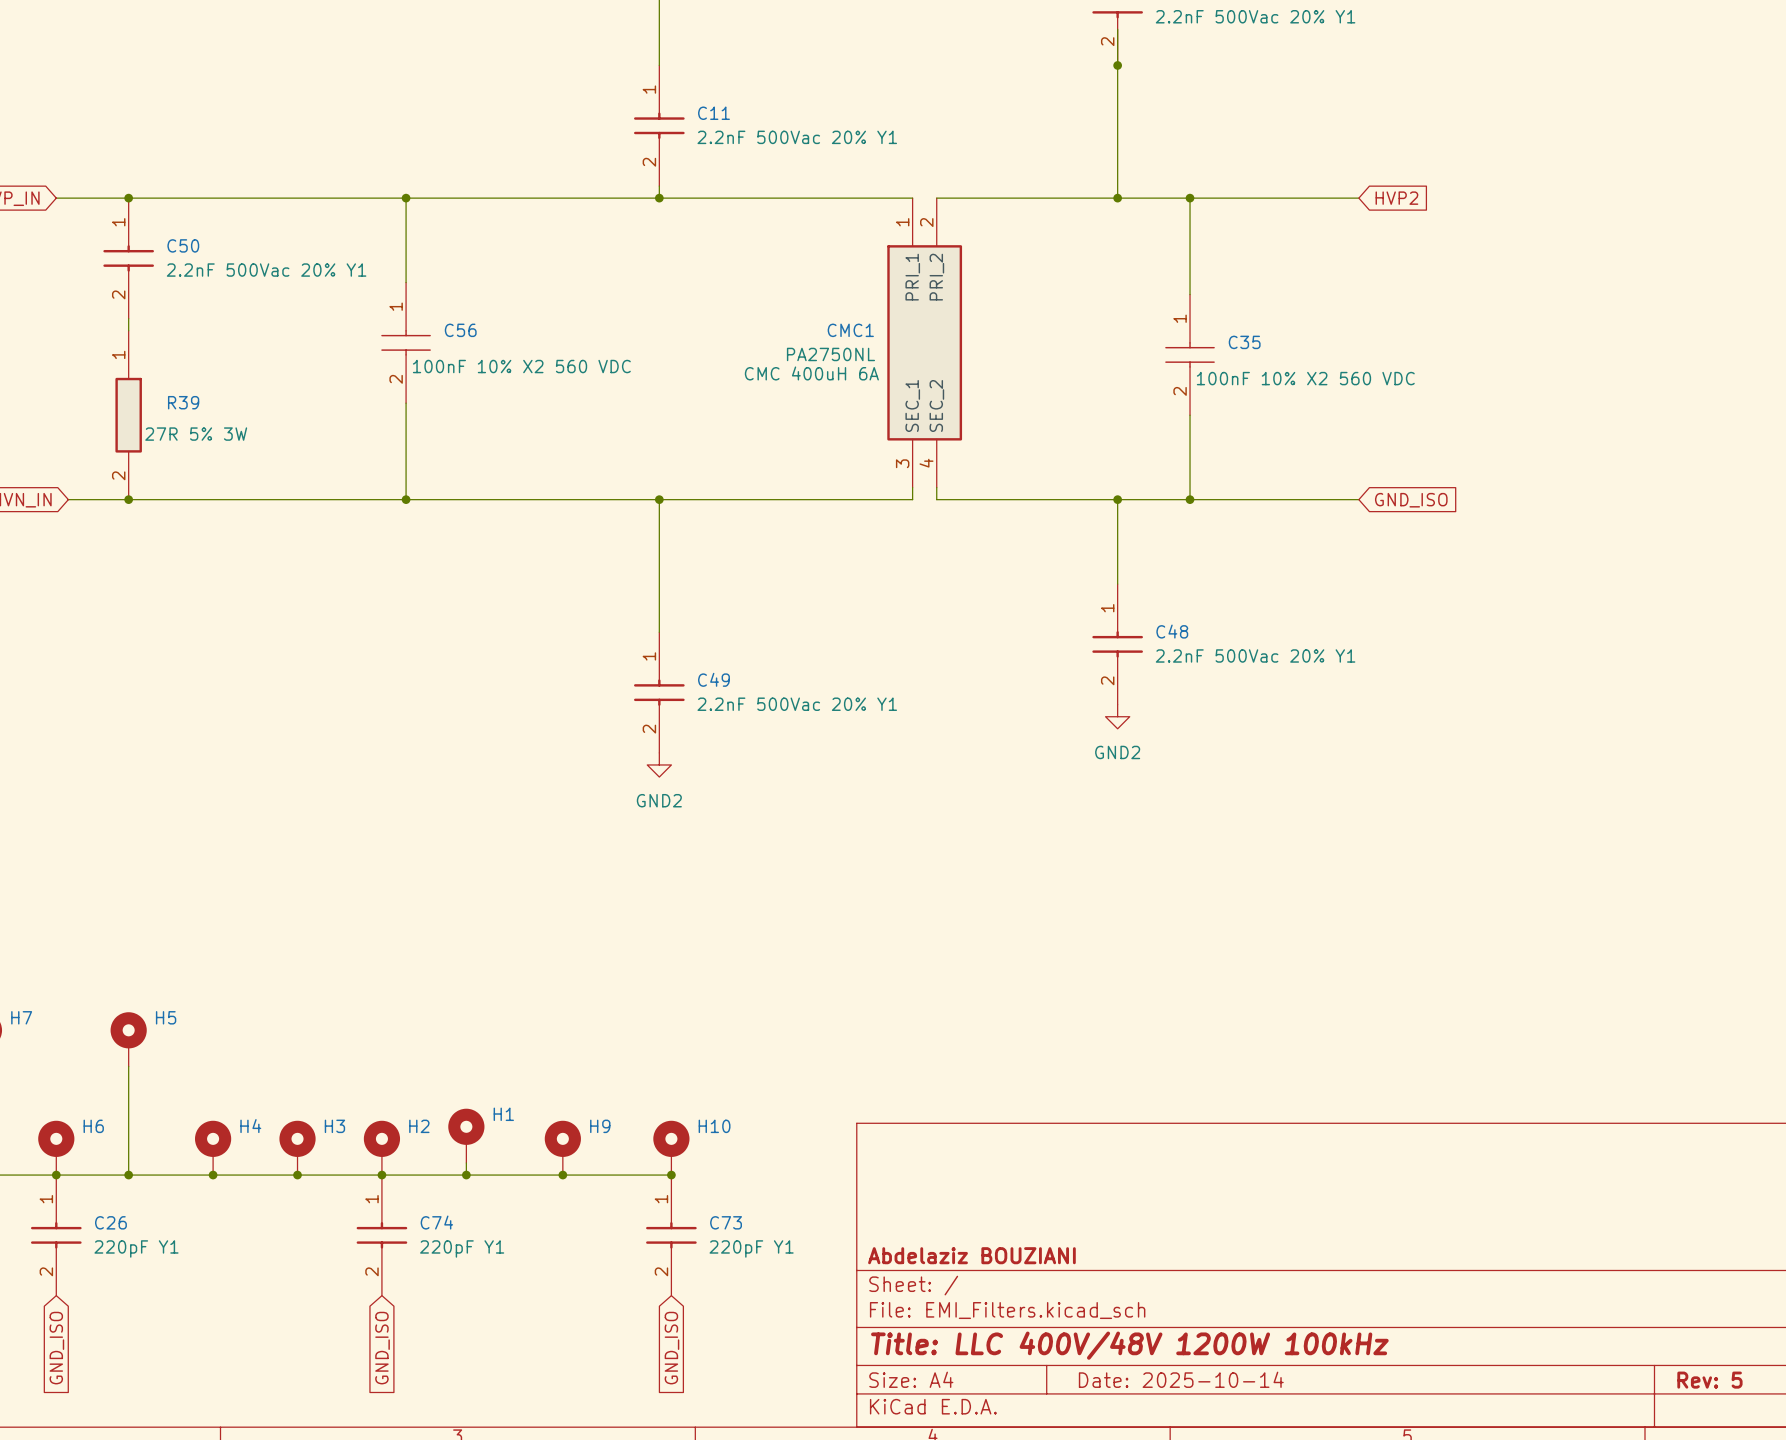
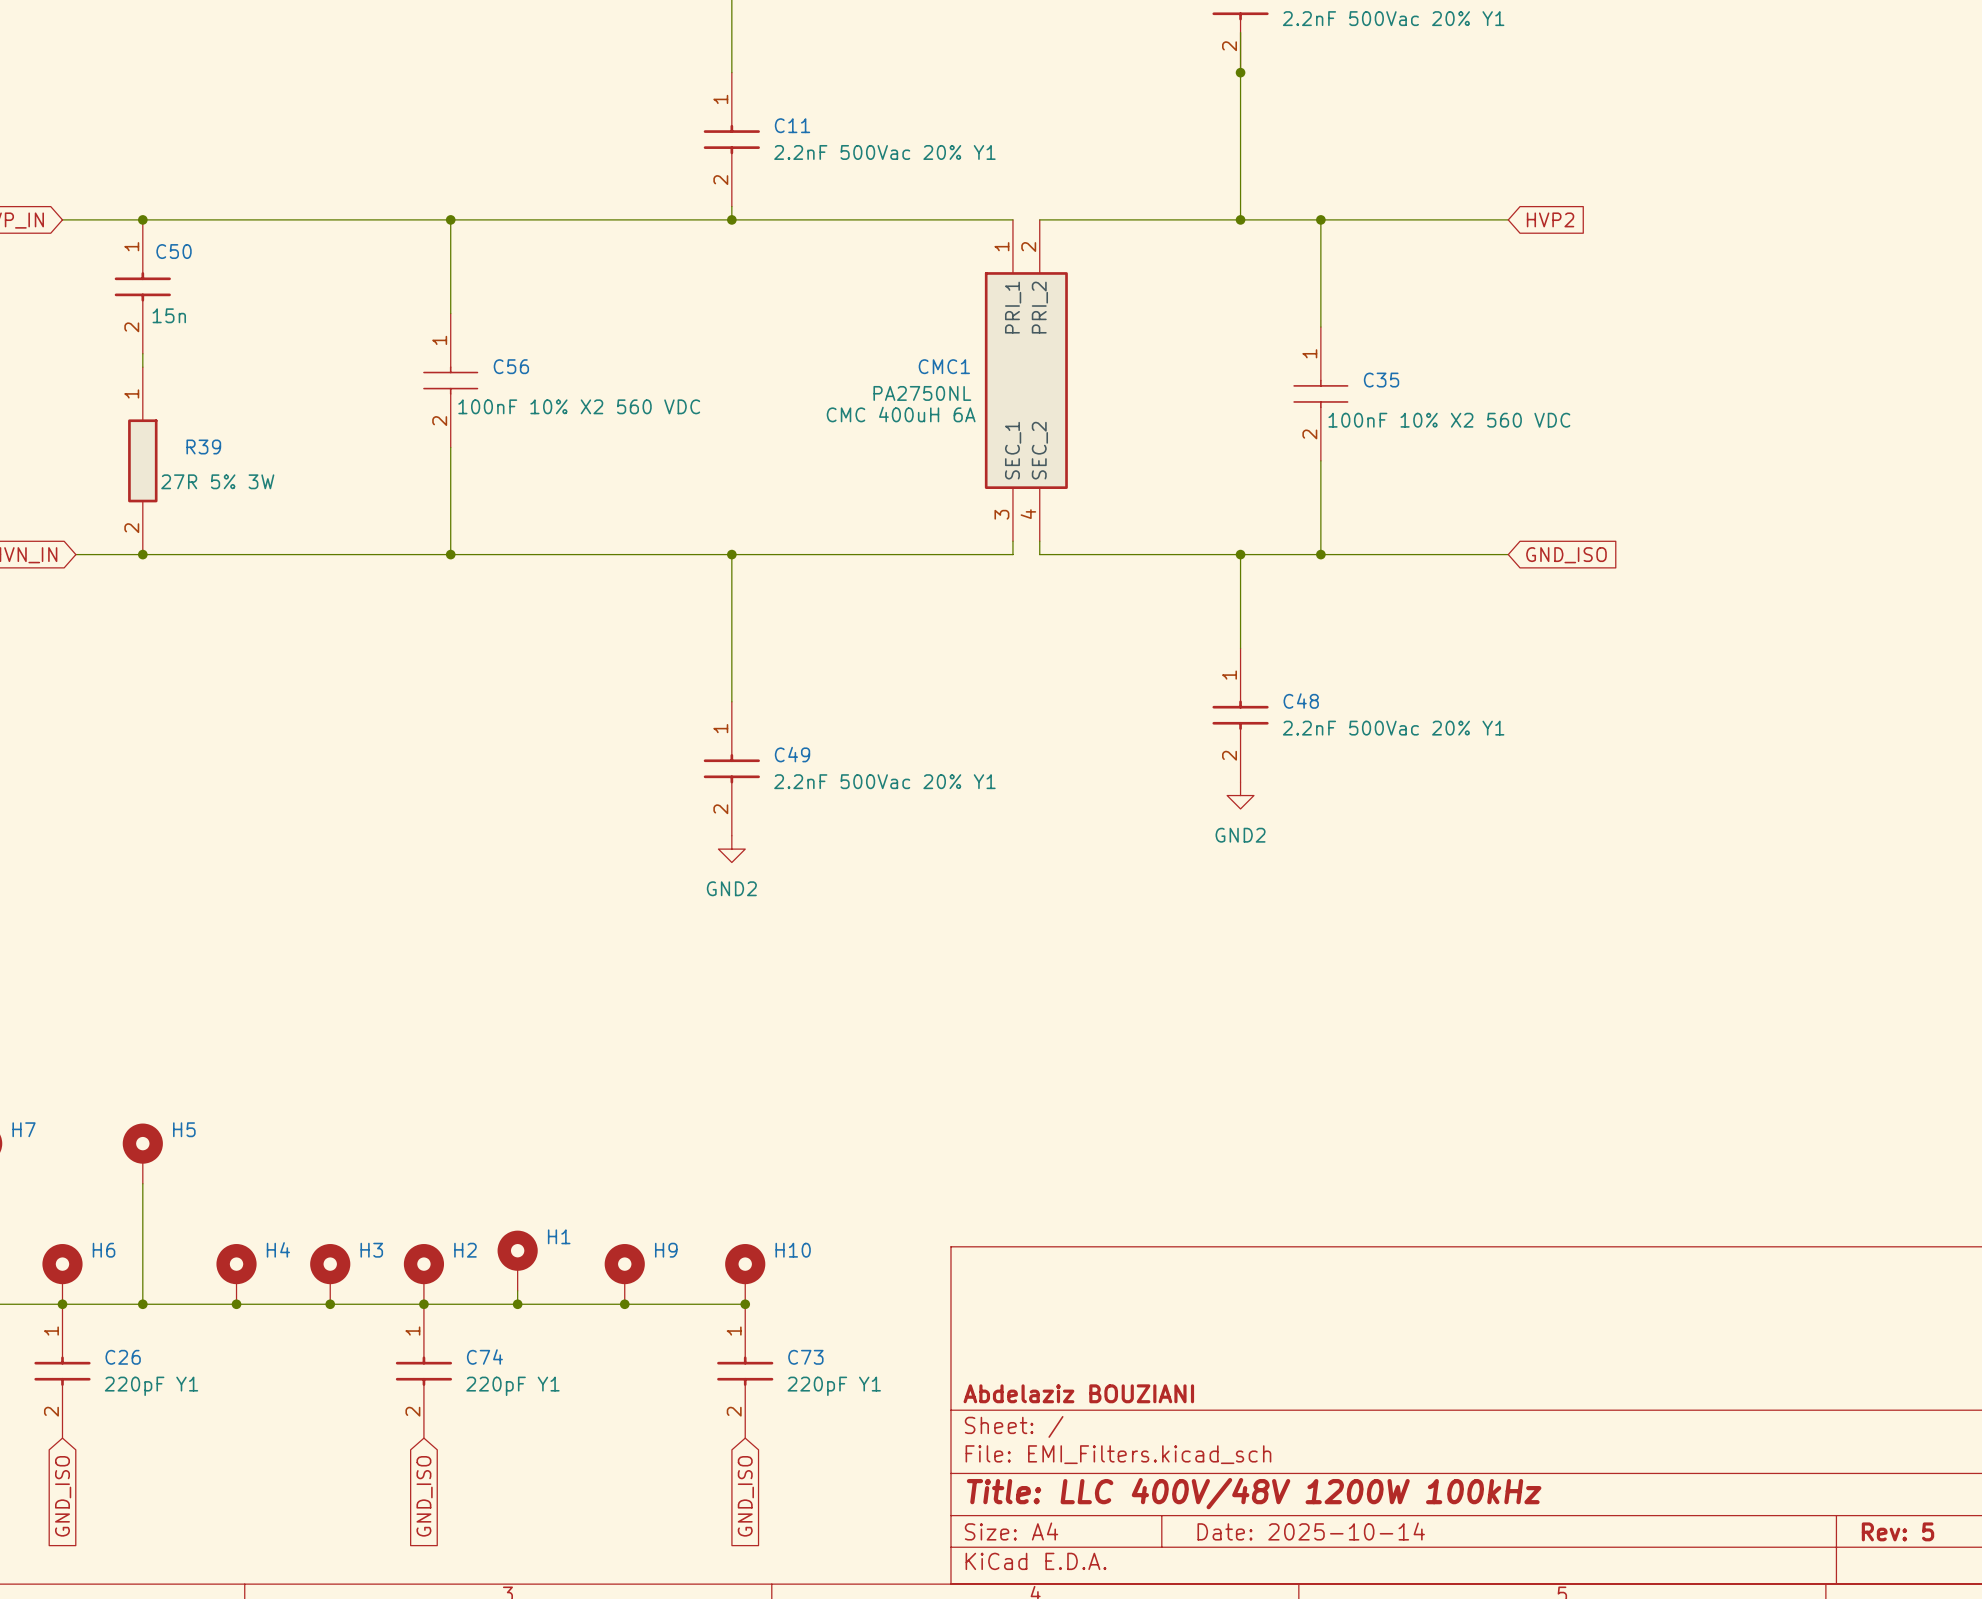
C50 name position: C50 (183, 245) -> C50 (174, 251)
C50 text: 2.2nF 500Vac 20% Y1 (266, 270) -> none
C50 text: none -> 15n (169, 315)

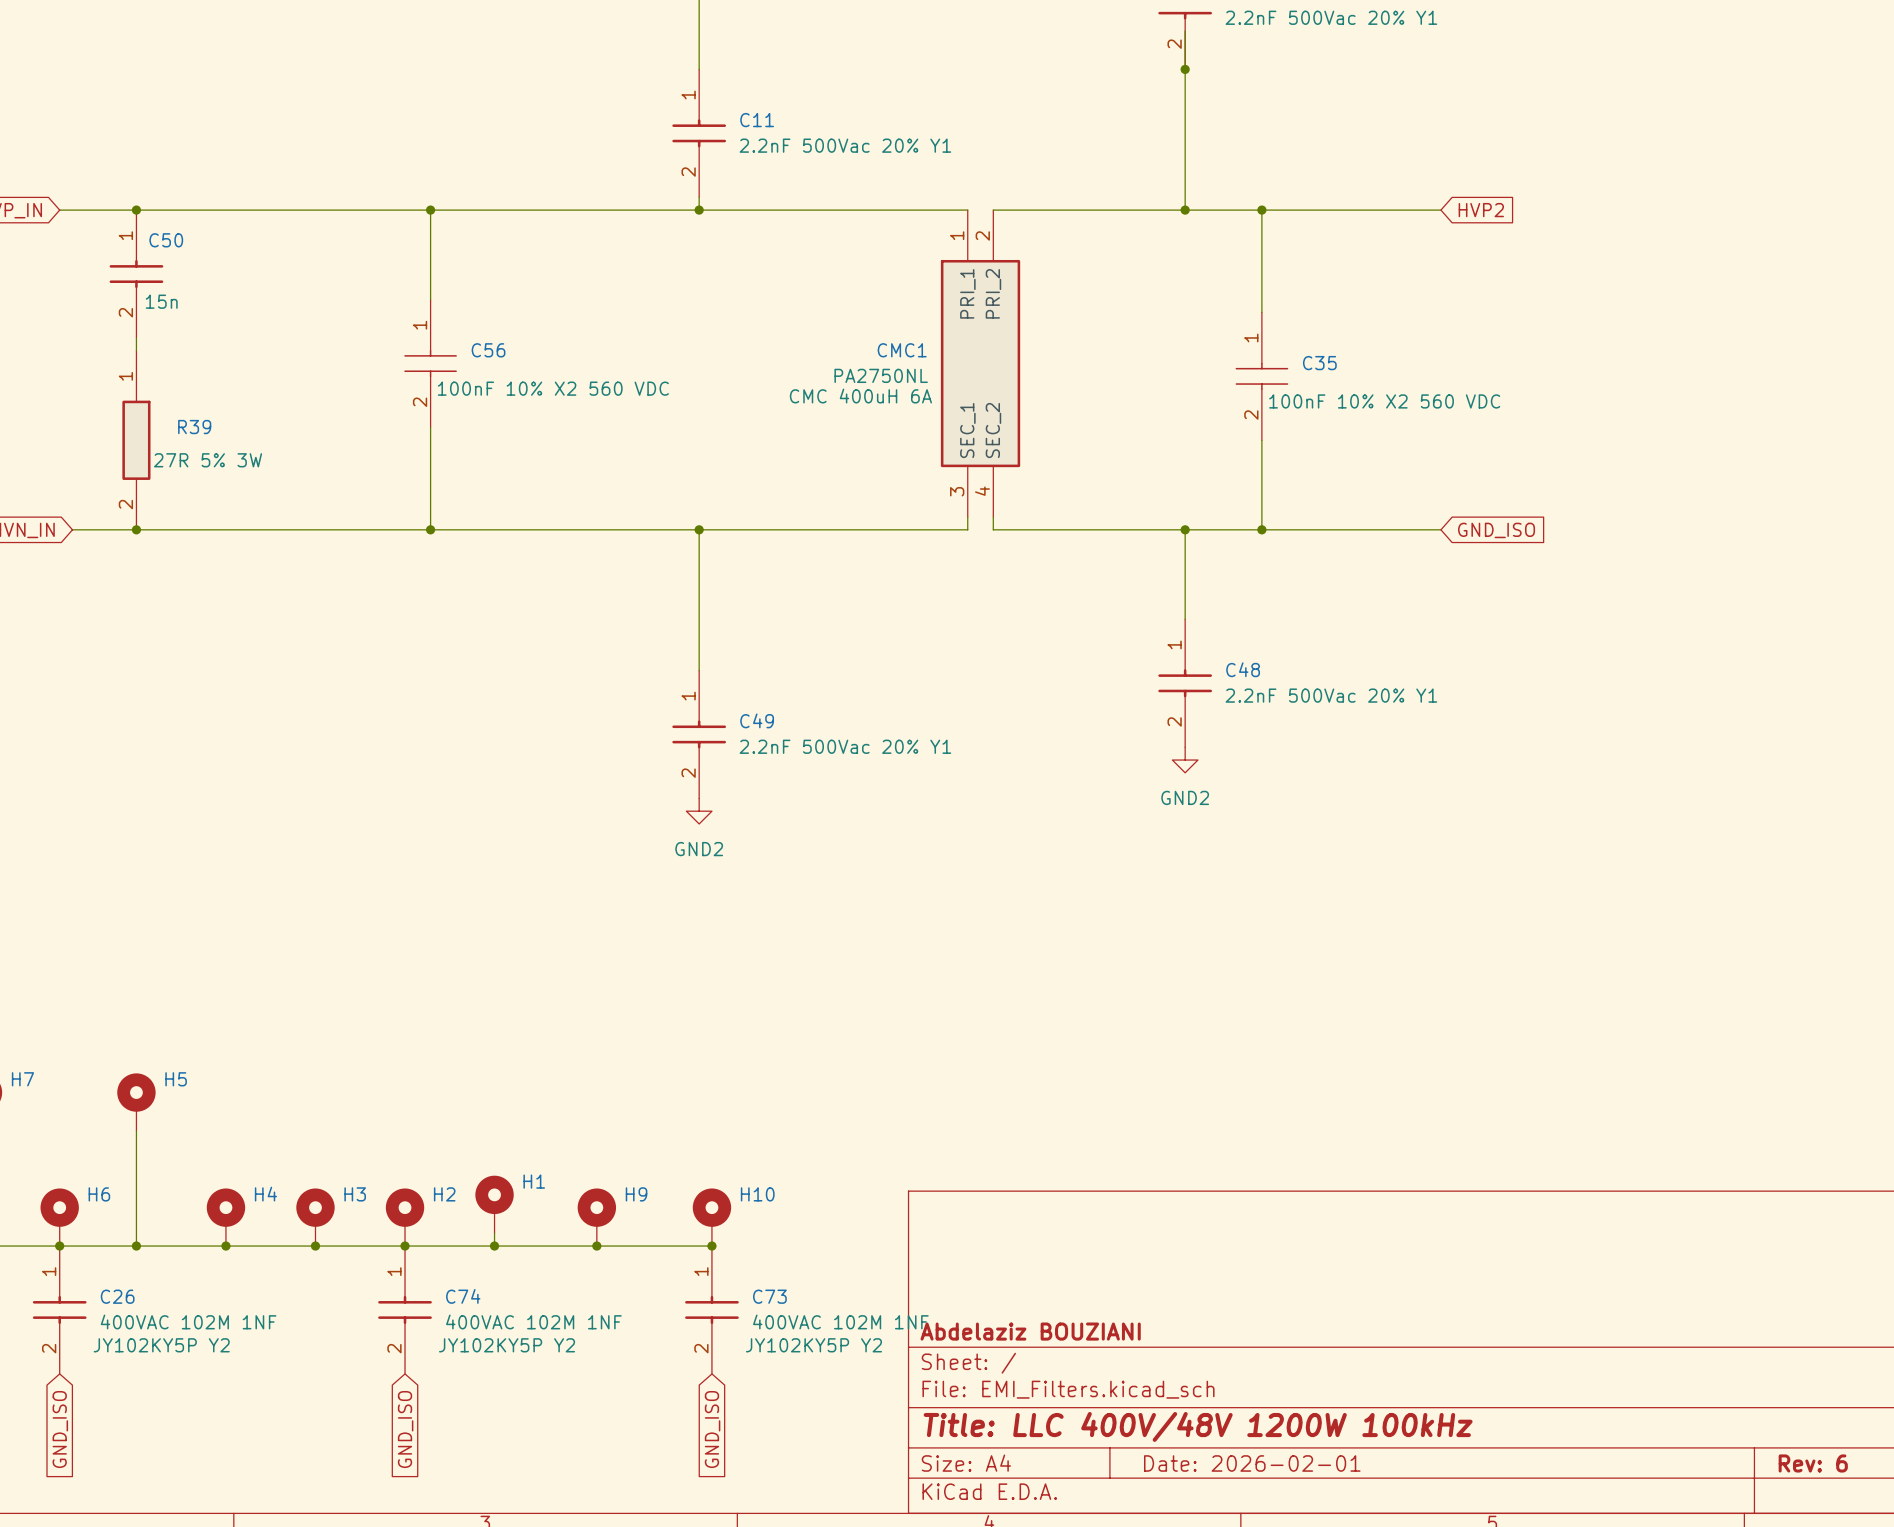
C26 text: 220pF Y1 (151, 1386) -> 400VAC 102M 1NF (188, 1321)
C74 text: 220pF Y1 (512, 1386) -> 400VAC 102M 1NF (533, 1321)
C73 text: 220pF Y1 (834, 1386) -> 400VAC 102M 1NF (840, 1321)
C26 value: none -> JY102KY5P Y2 (161, 1345)
C74 value: none -> JY102KY5P Y2 (507, 1345)
C73 value: none -> JY102KY5P Y2 (813, 1345)
title block: Date: 2025-10-14 (1311, 1531) -> Date: 2026-02-01 (1252, 1463)
title block: Rev: 5 (1897, 1531) -> Rev: 6 (1813, 1463)

